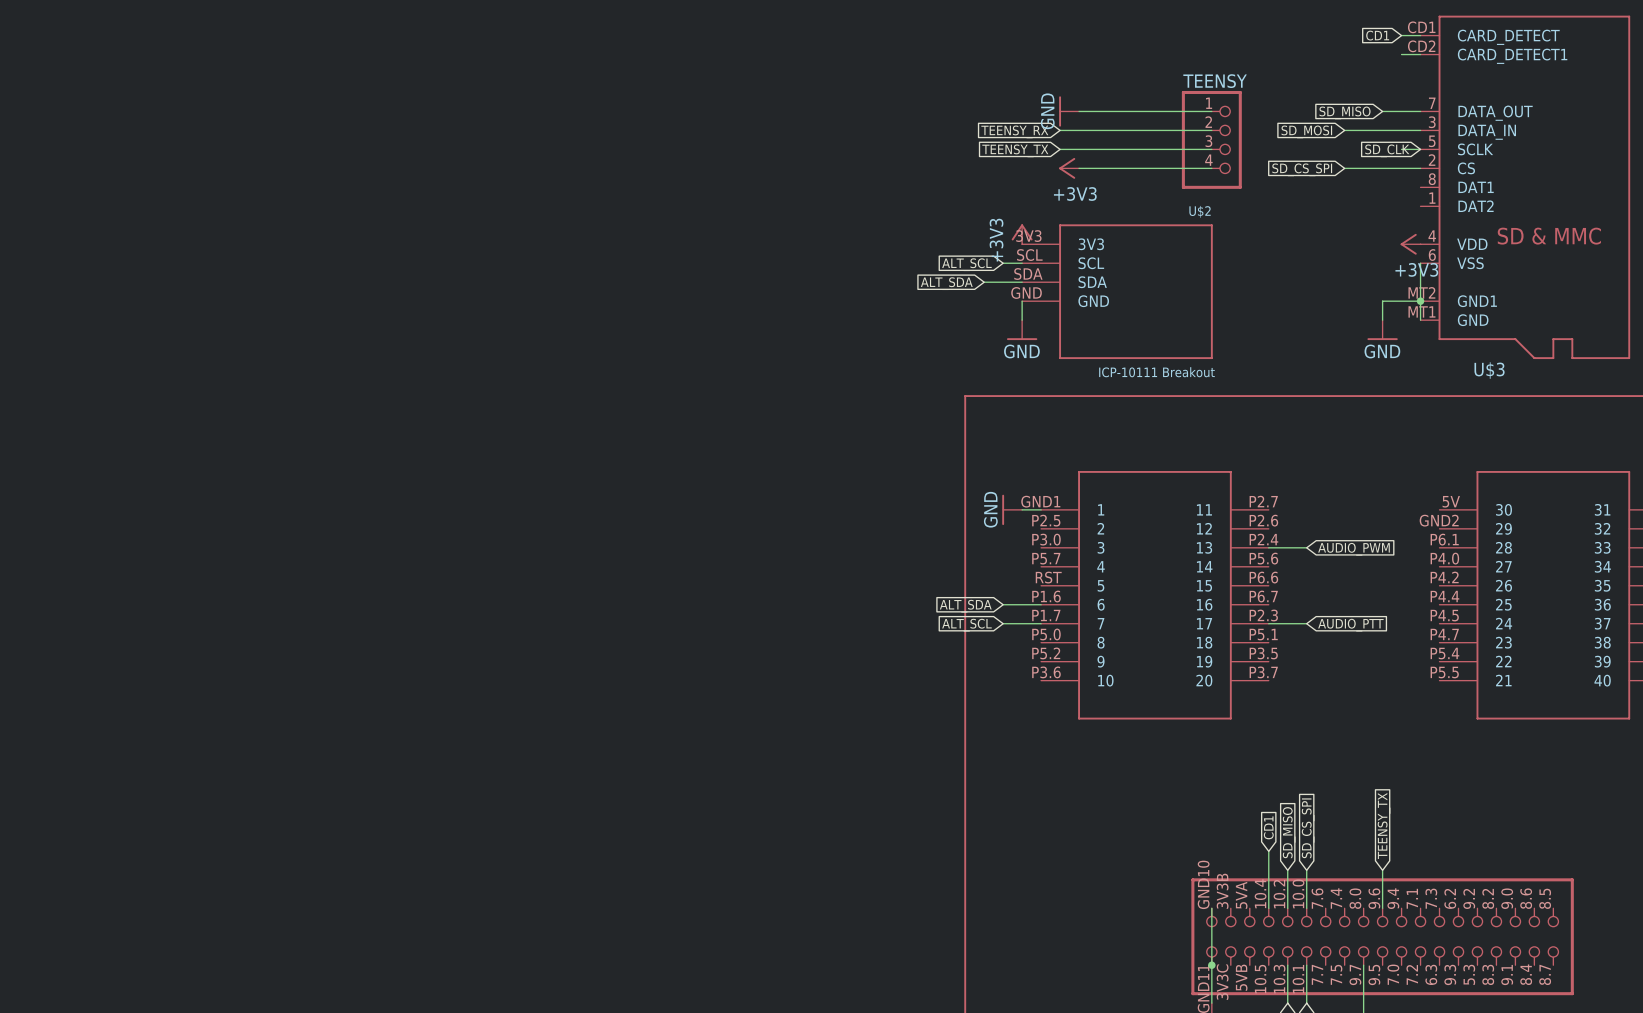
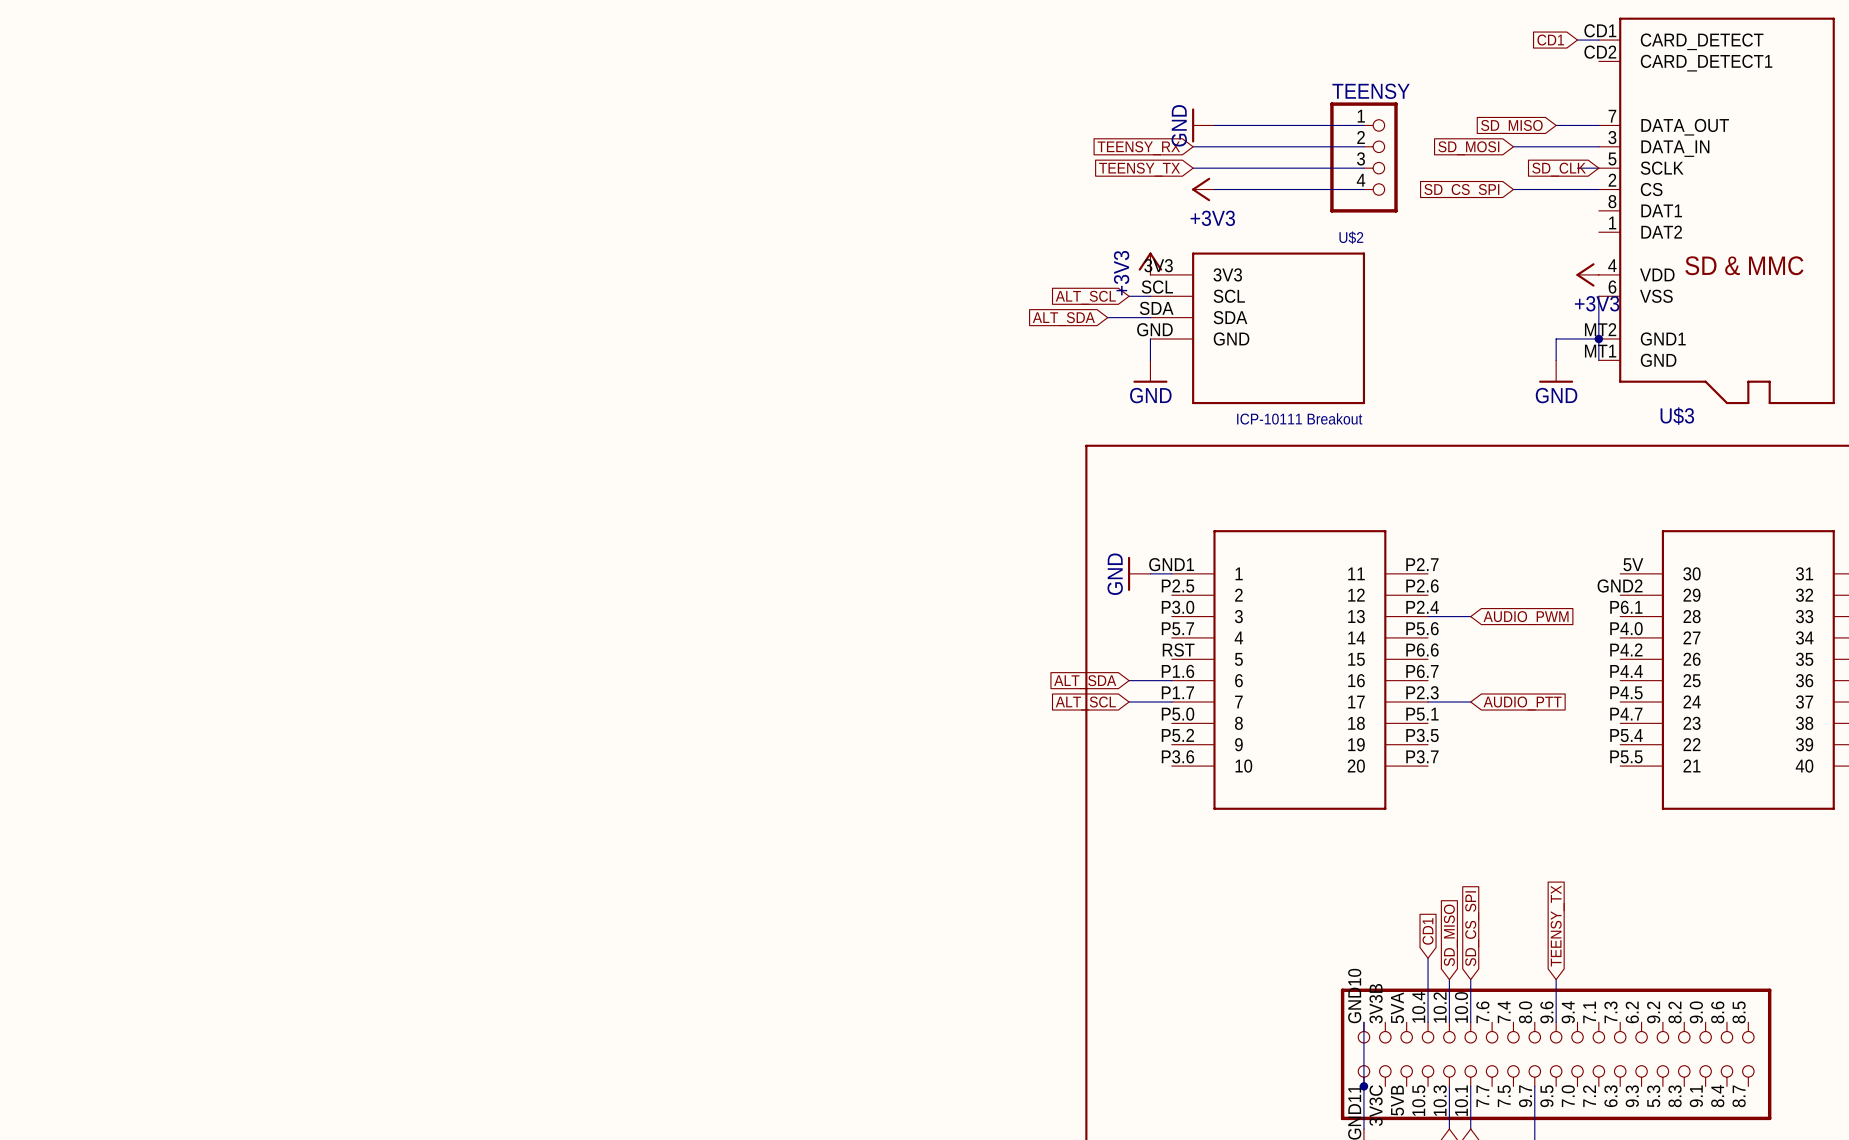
wire: (1401, 54) (1420, 54) -> none

